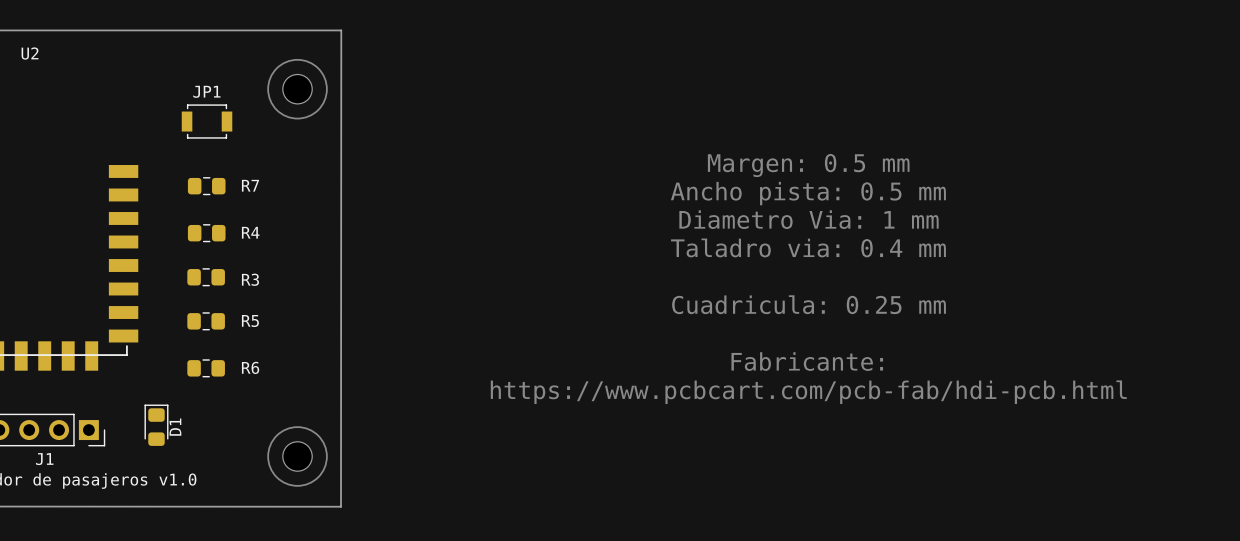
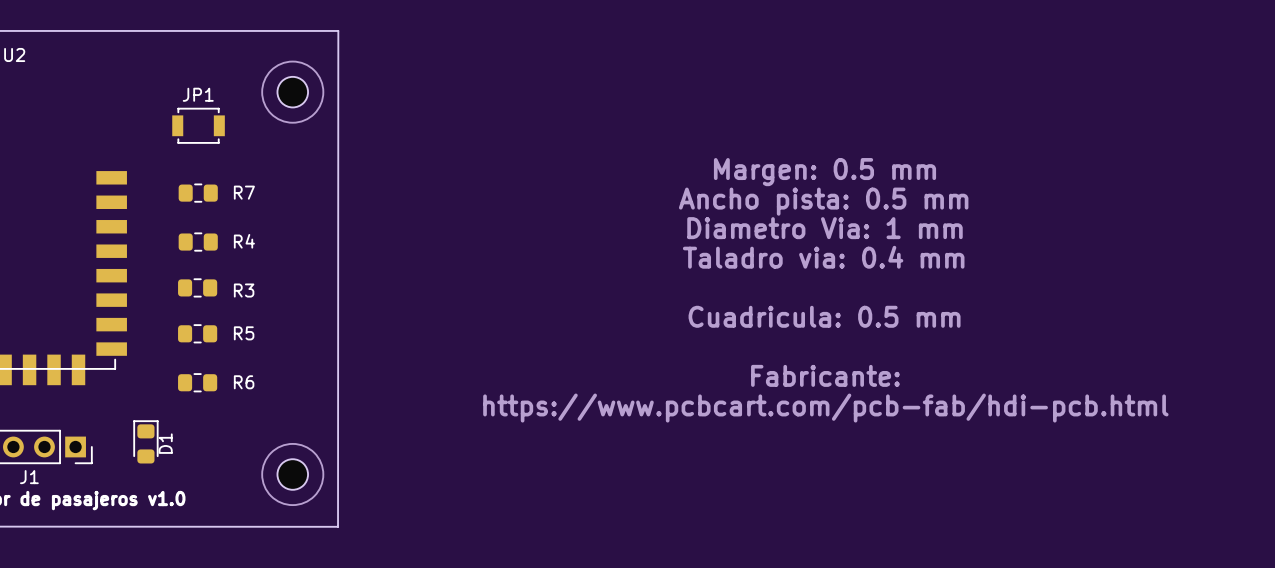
text: Cuadricula: 0.25 mm (809, 304) -> Cuadricula: 0.5 mm (824, 316)

